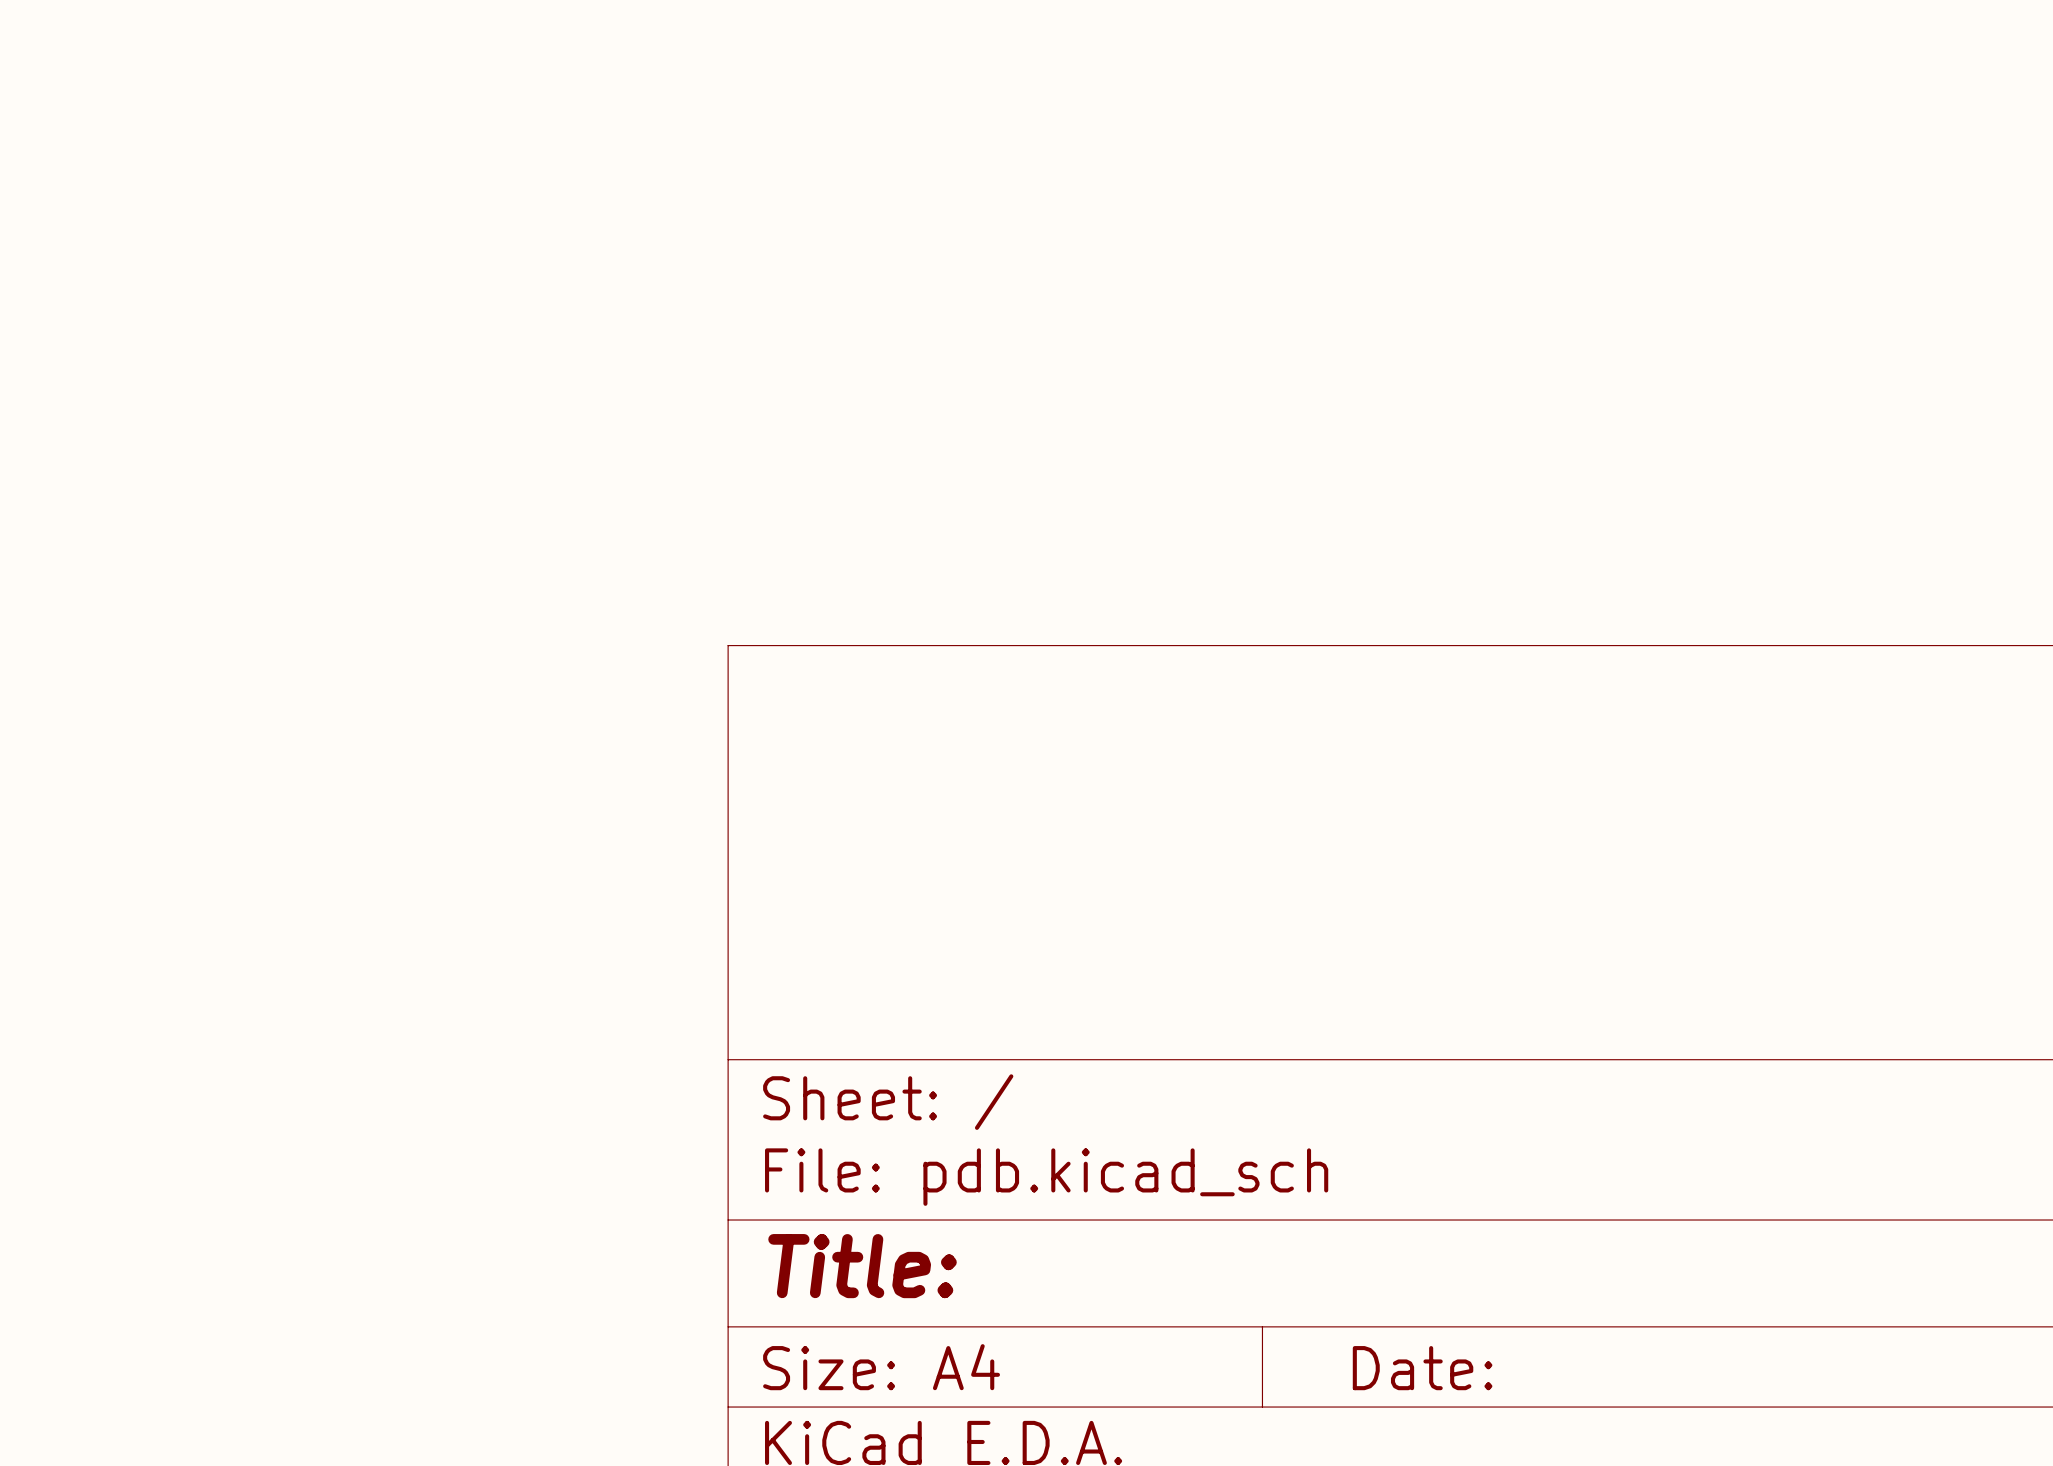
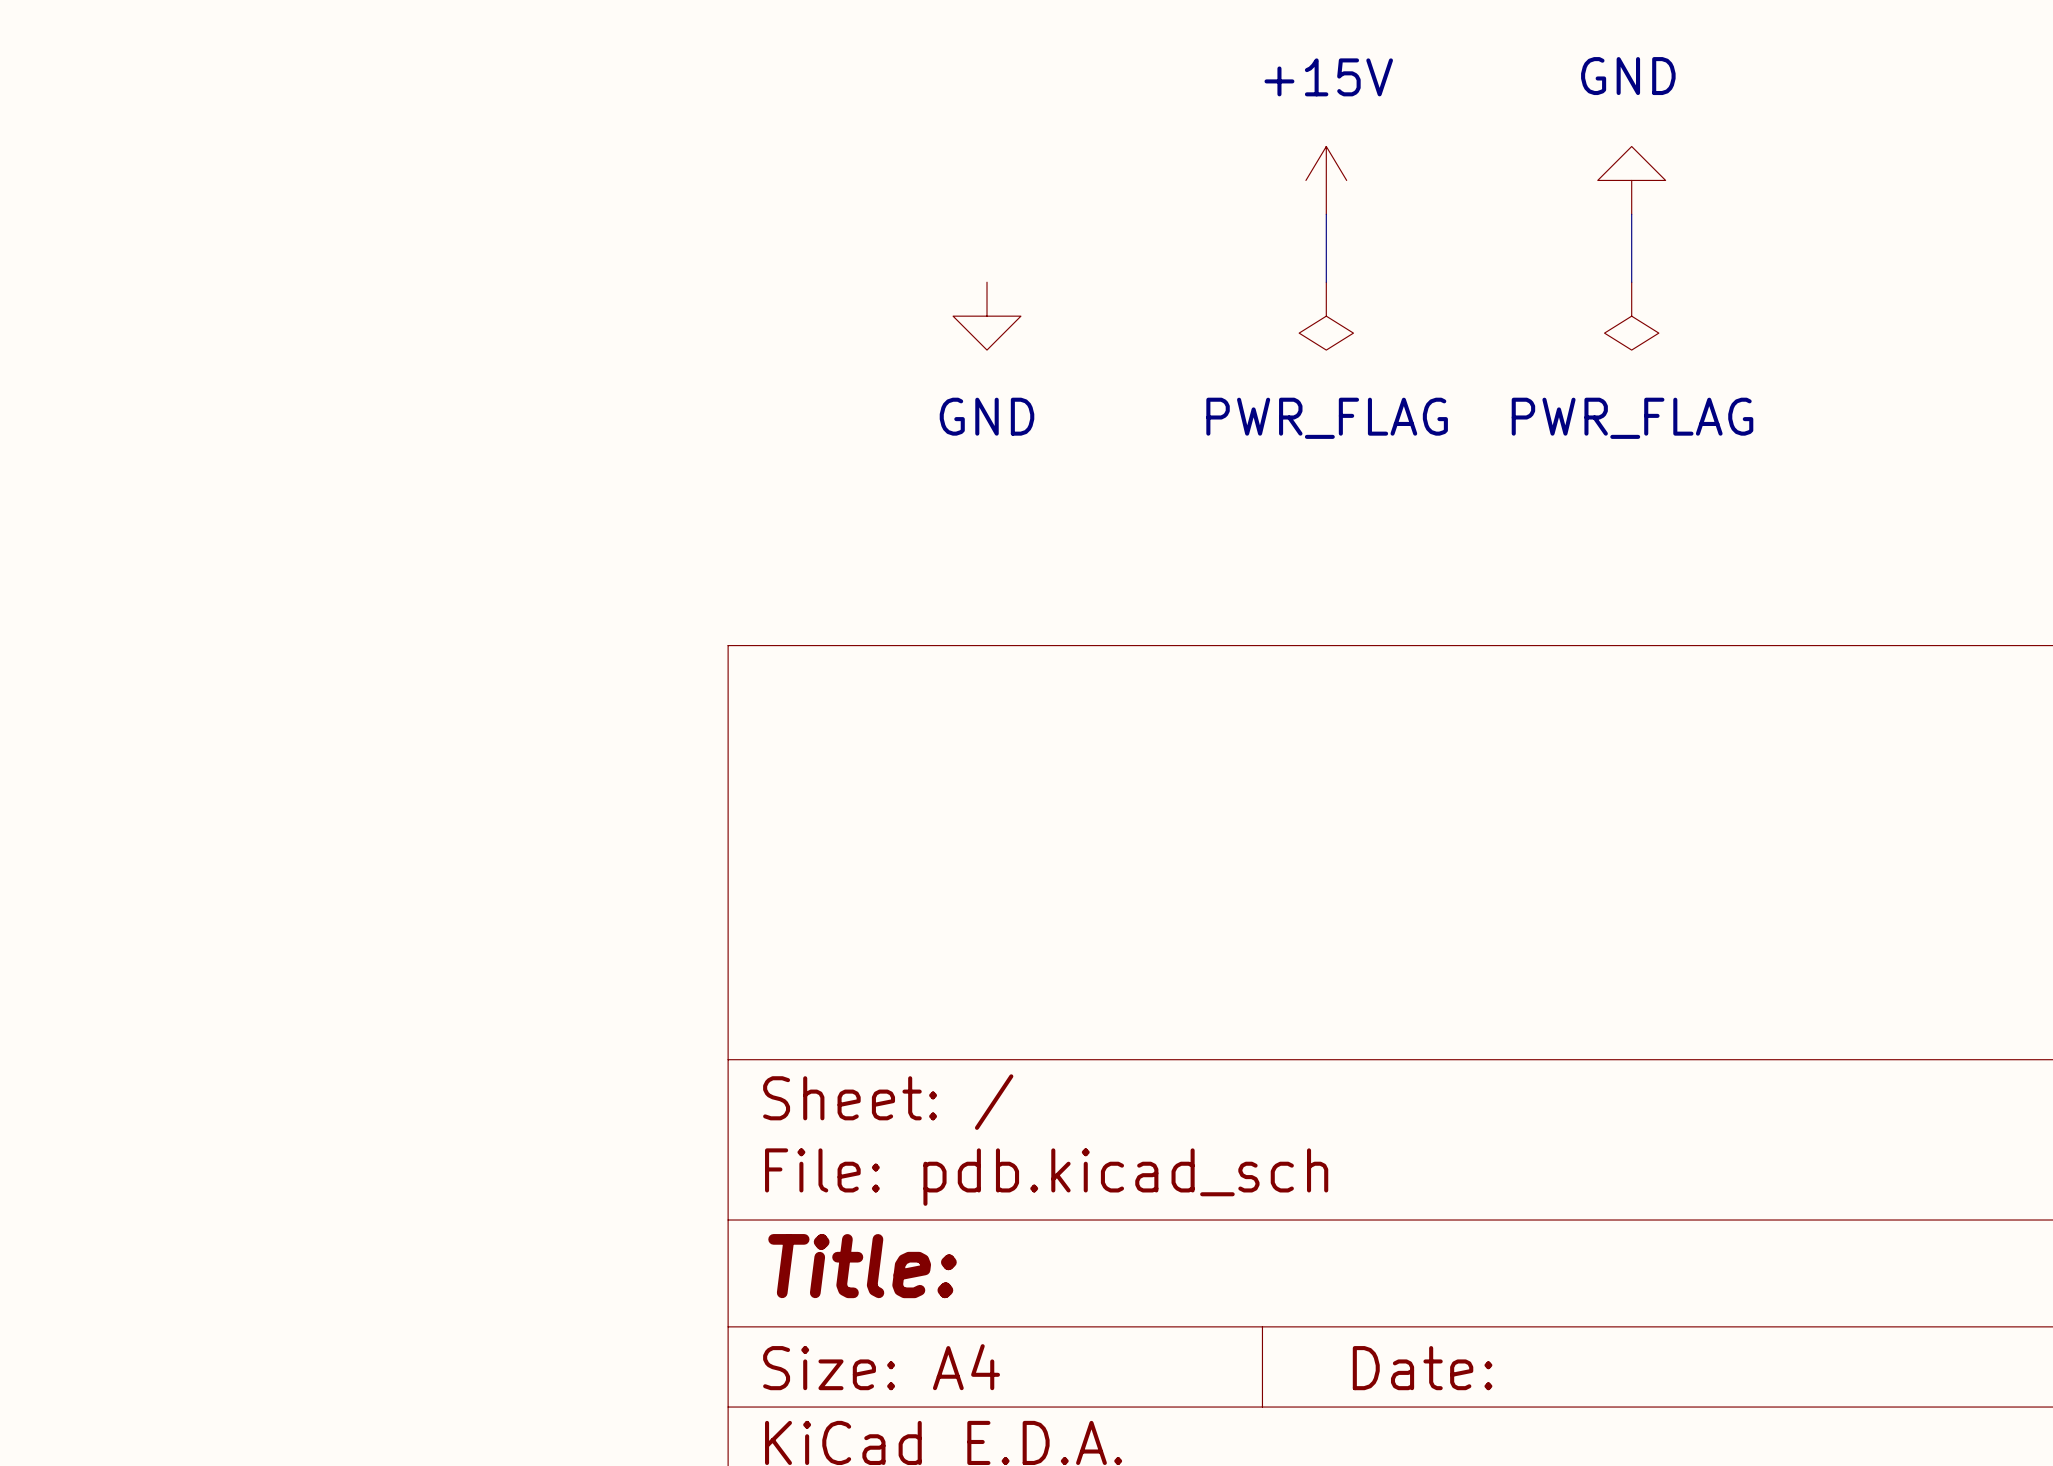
power symbol: none -> +15V (1326, 180)
power symbol: none -> GND (1631, 180)
wire: none -> (1326, 214) (1326, 282)
wire: none -> (1631, 214) (1631, 282)
power symbol: none -> GND (987, 316)
power symbol: none -> PWR_FLAG (1326, 316)
power symbol: none -> PWR_FLAG (1631, 316)

